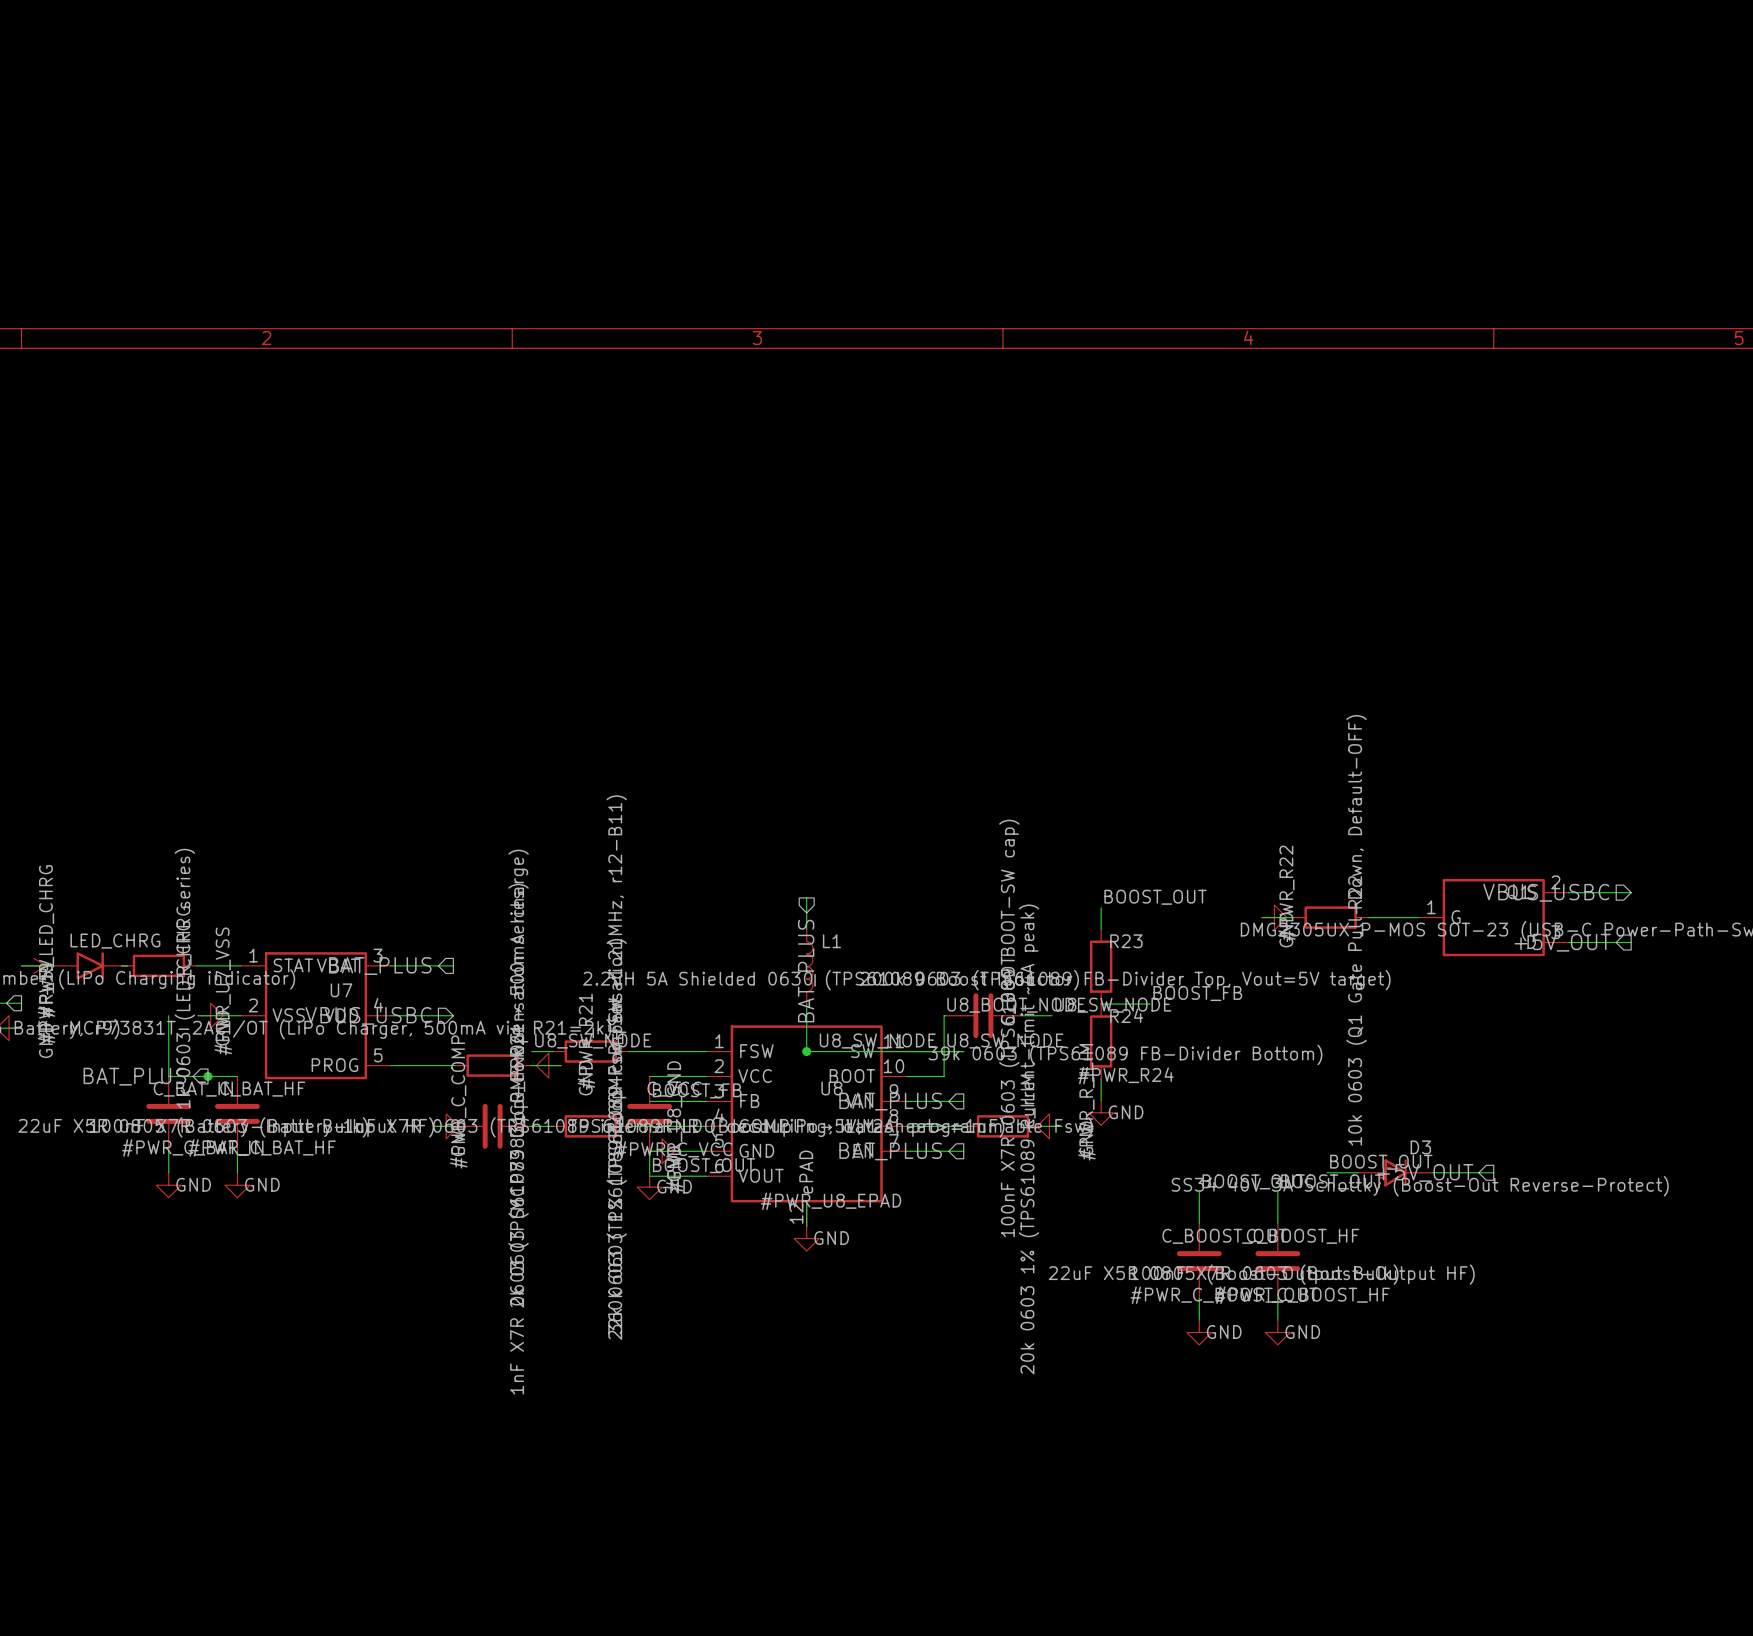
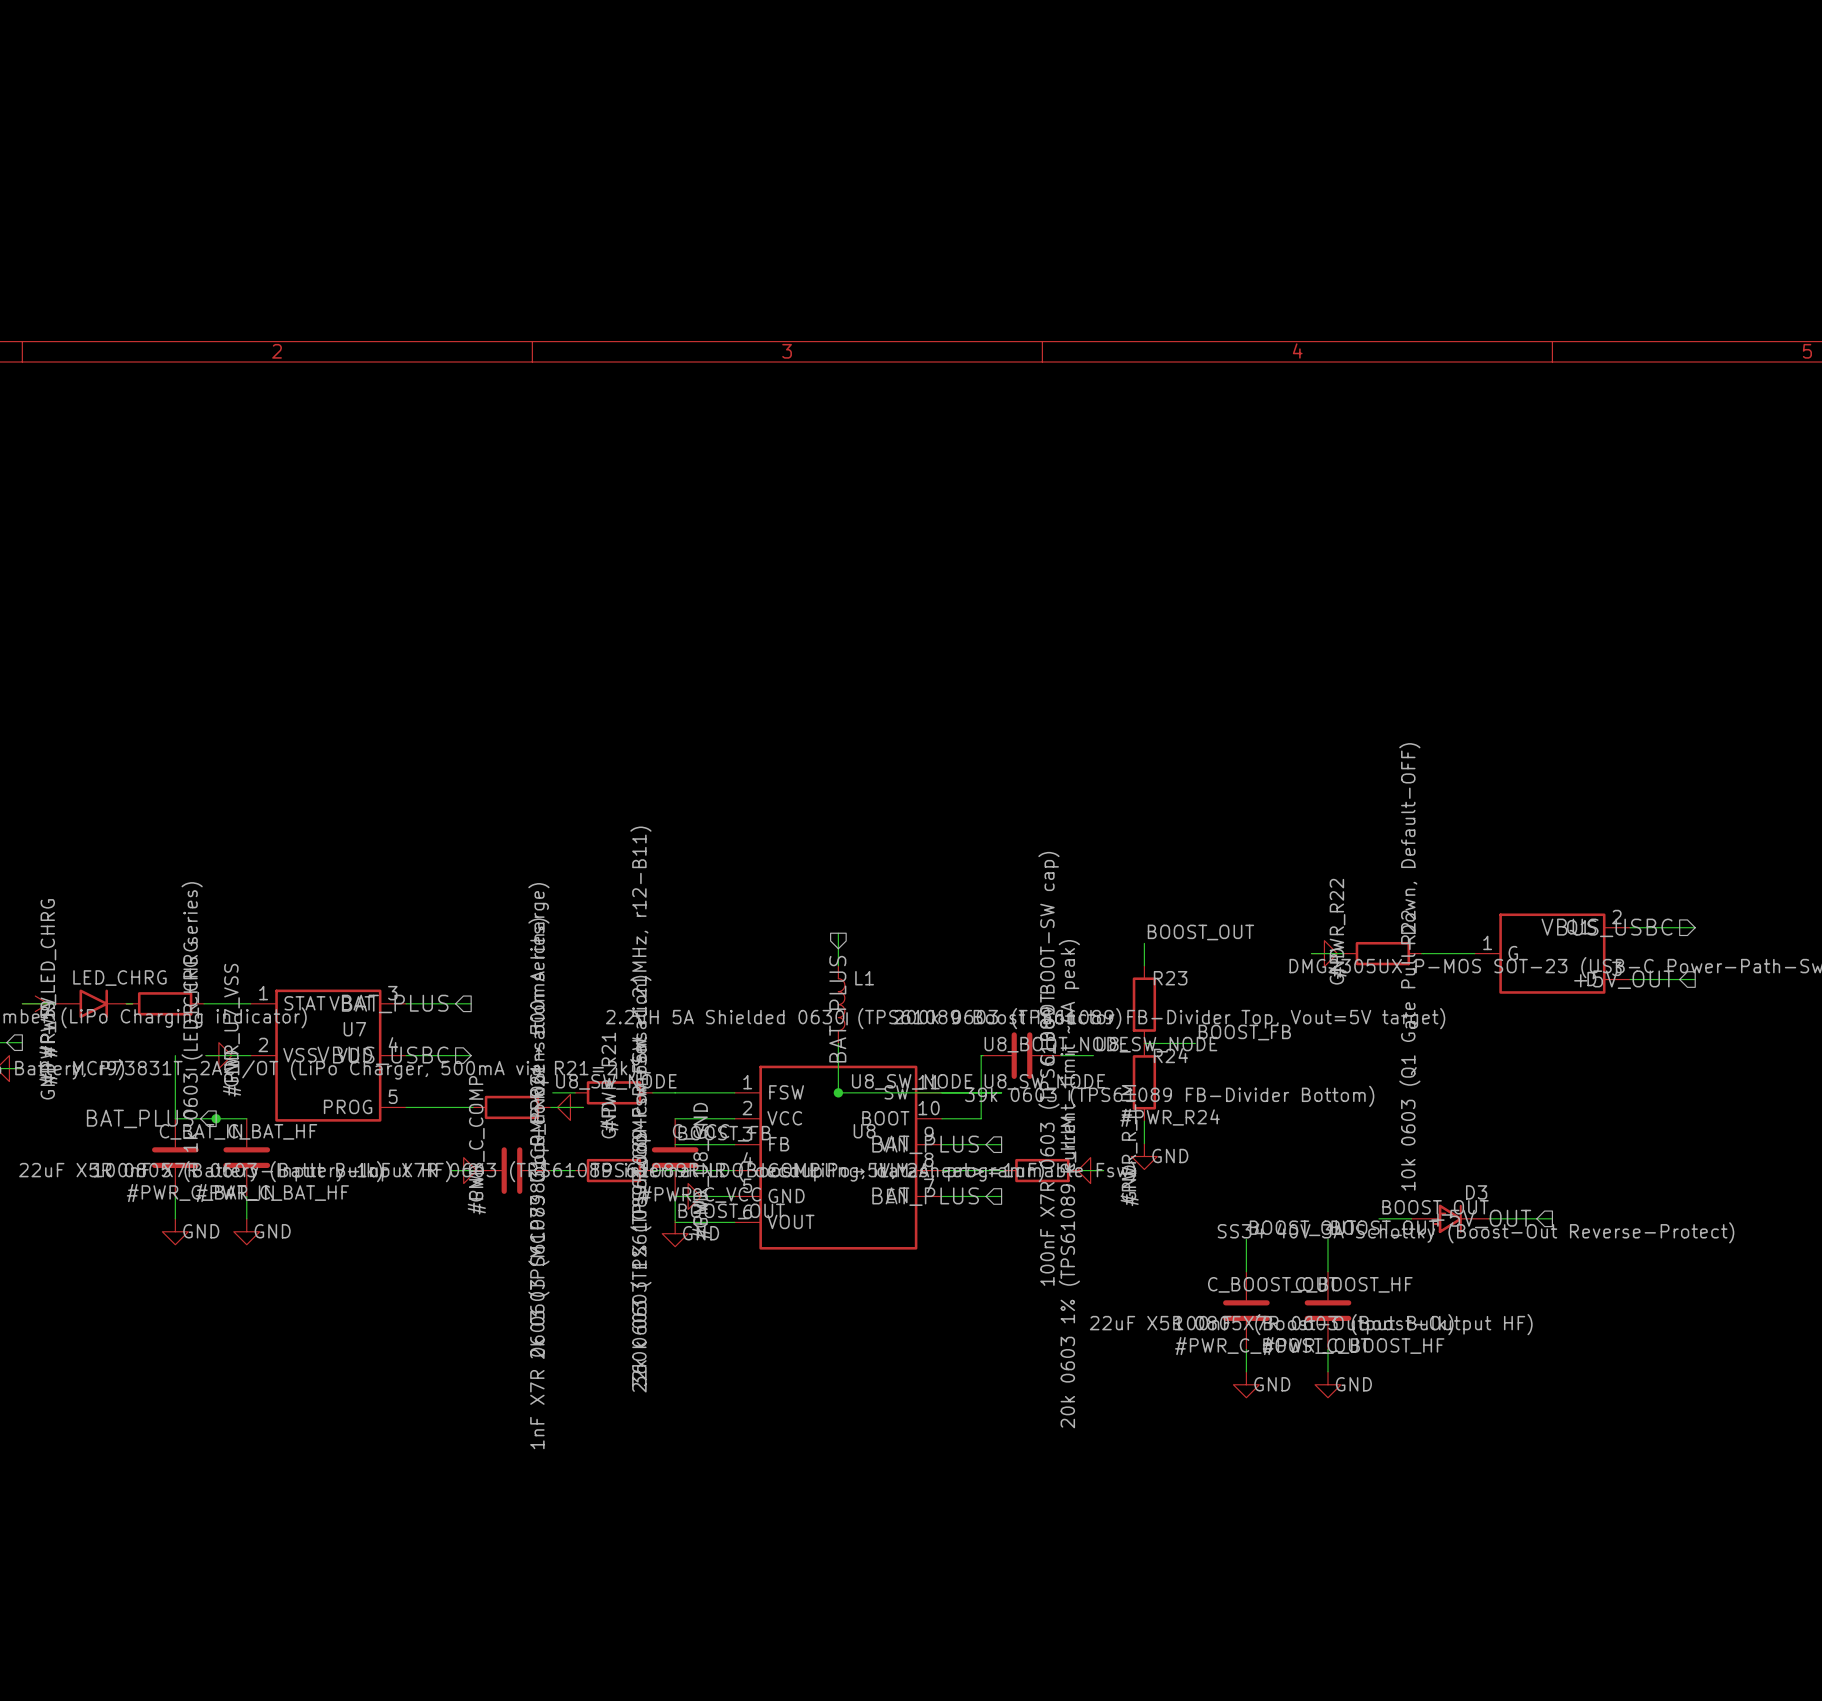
U8 symbol: [706, 1025, 907, 1227] -> [734, 1065, 943, 1250]
wire: (806, 1201) (806, 1226) -> none
#PWR_U8_EPAD: GND (806, 1238) -> none

